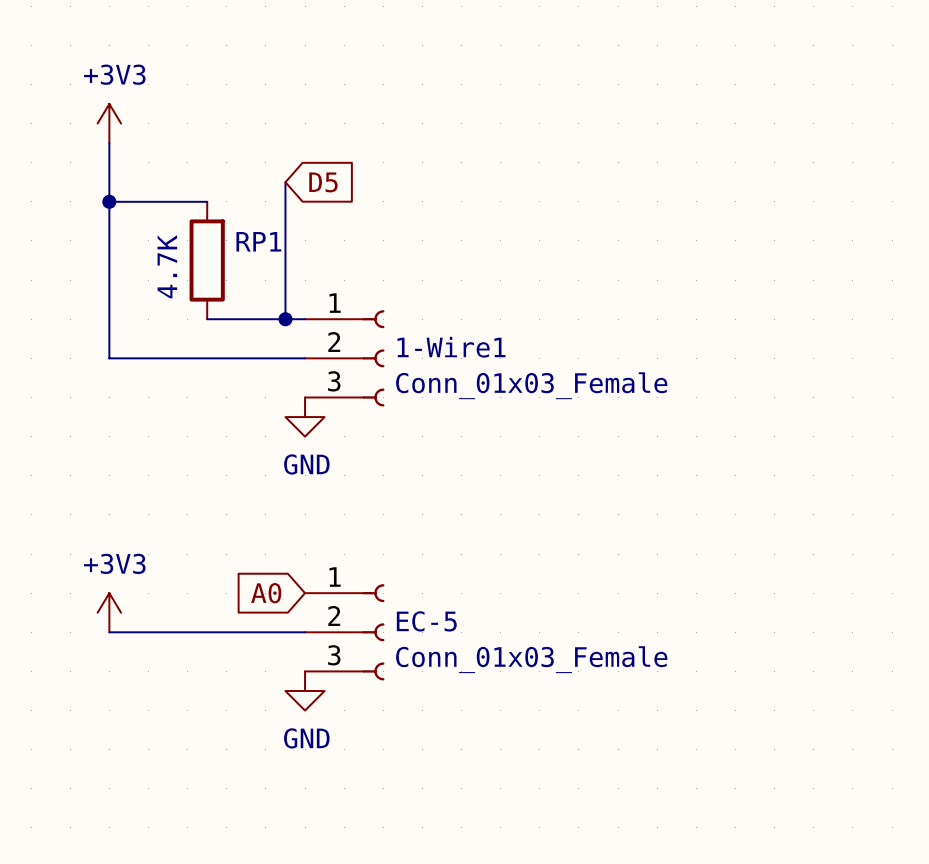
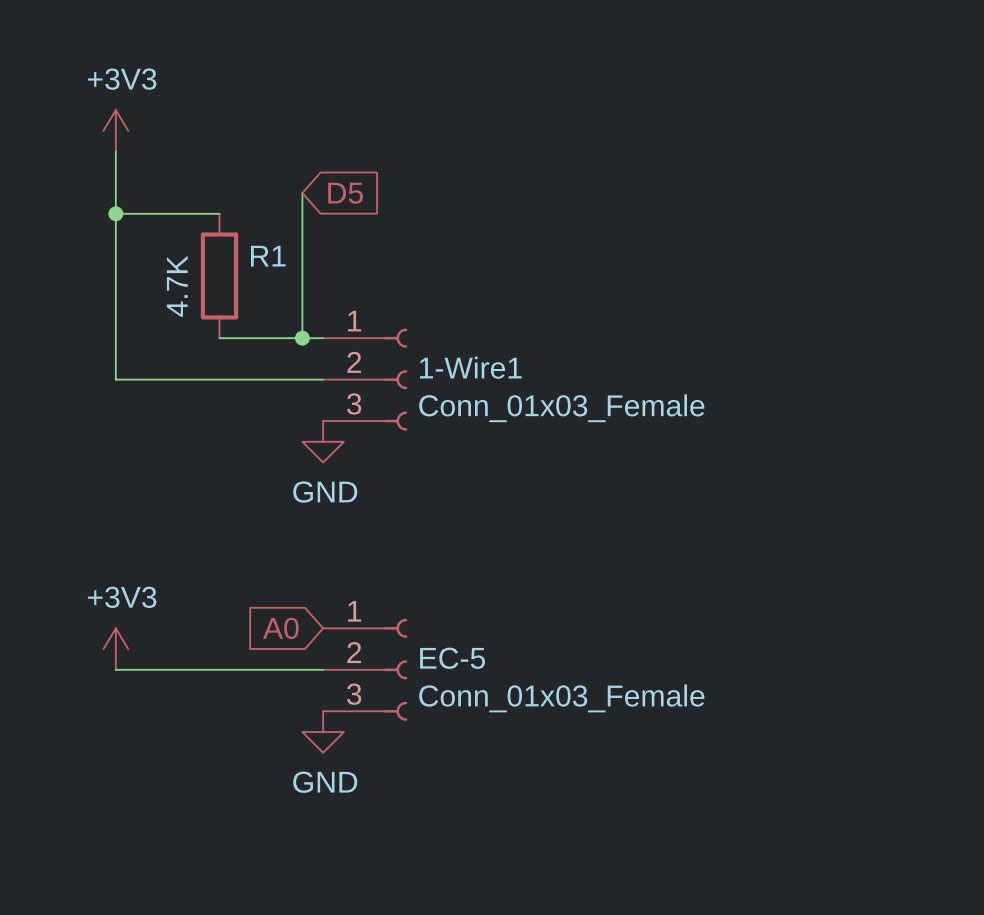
RP1 name: RP1 (258, 241) -> R1 (268, 256)

